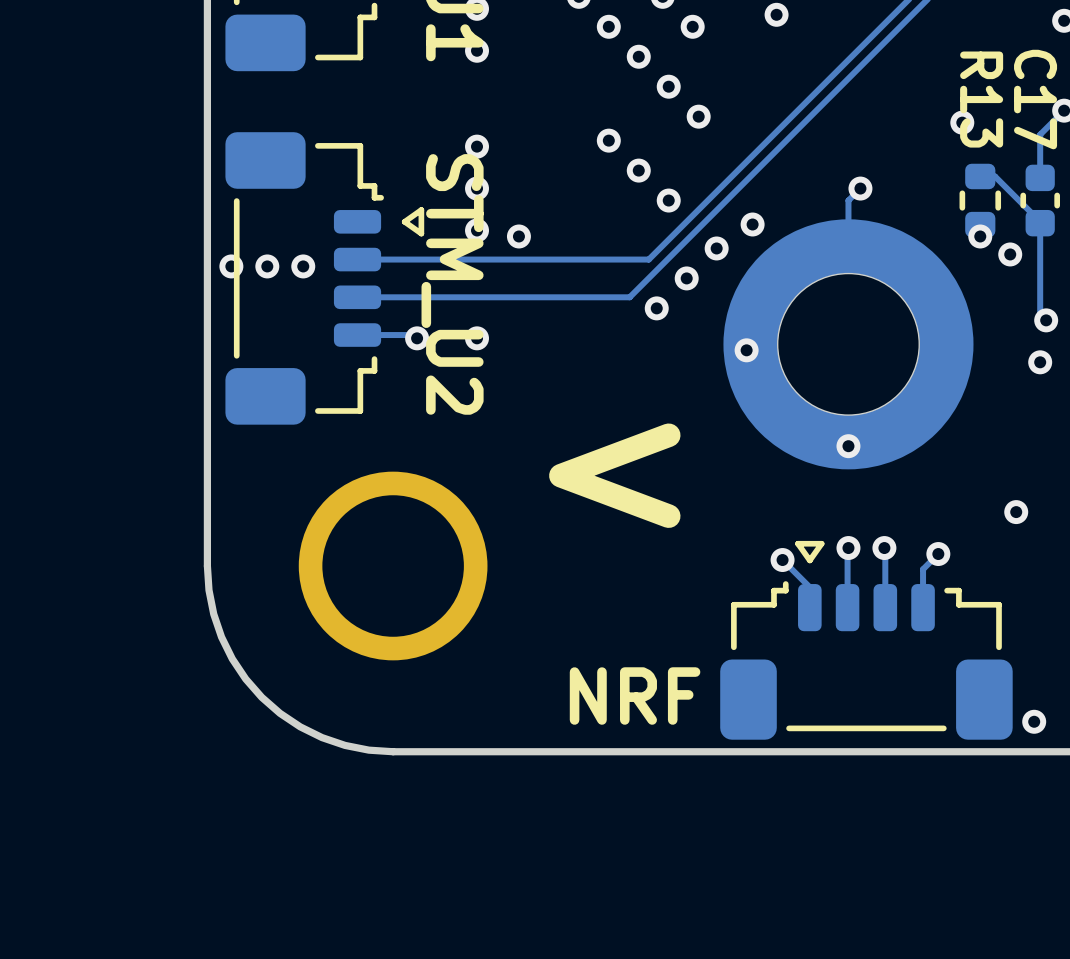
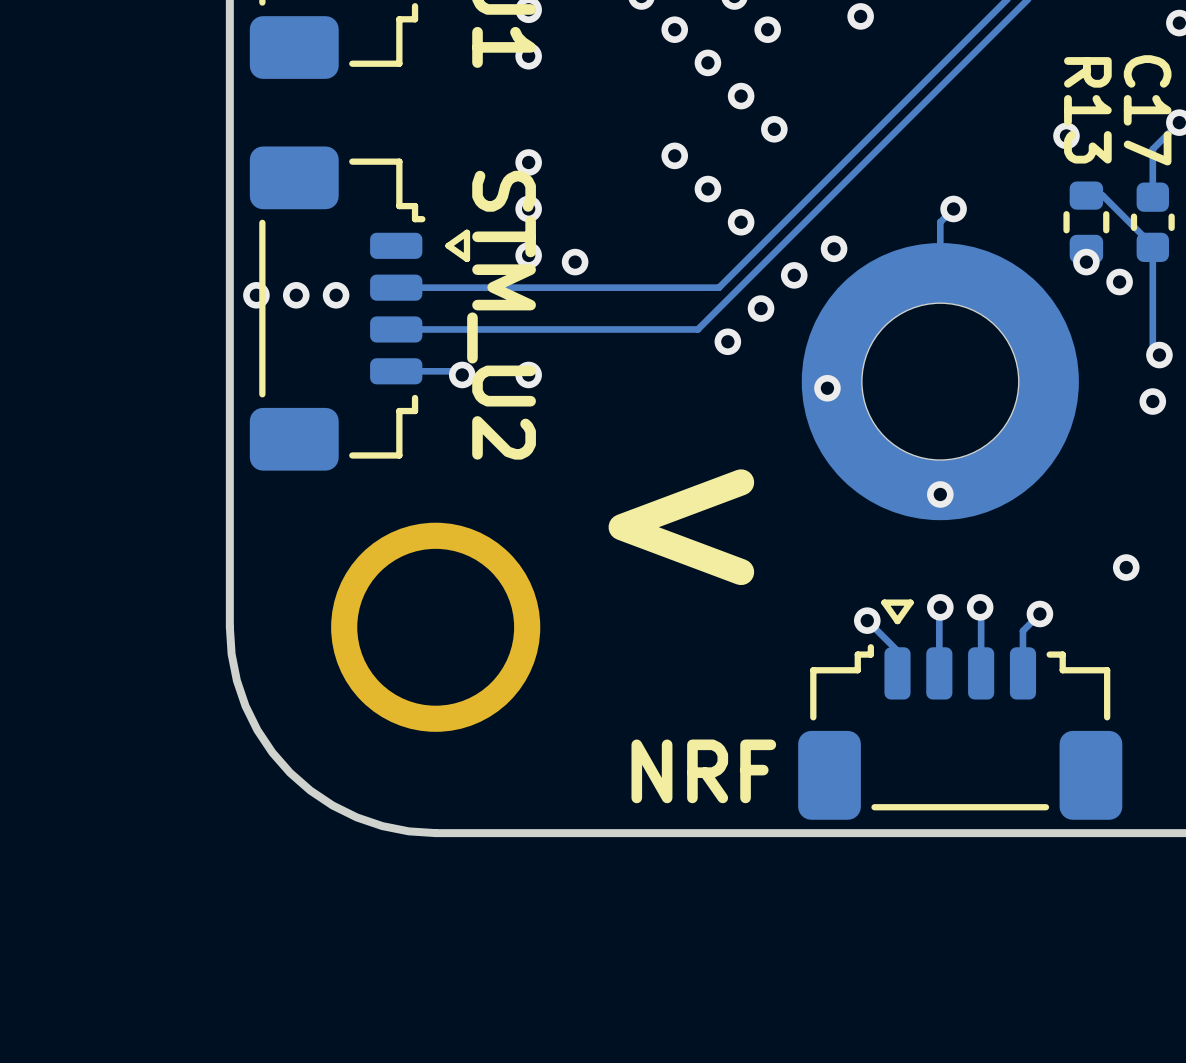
via: (1034, 721) -> none

